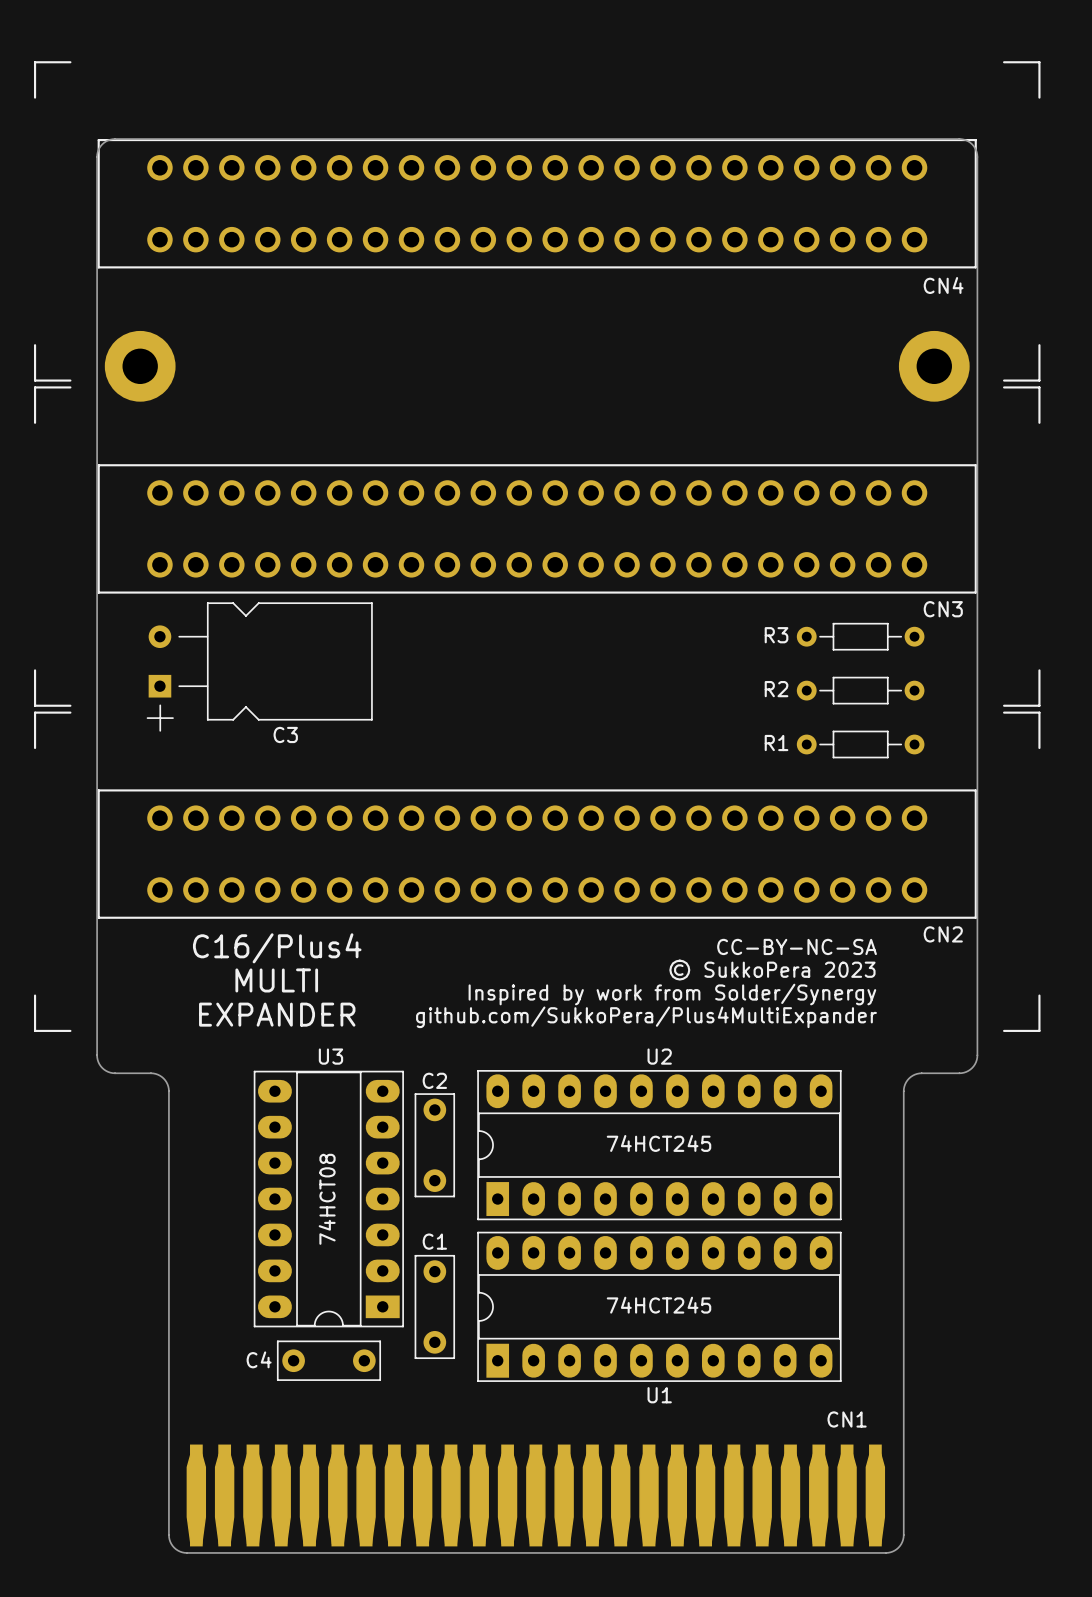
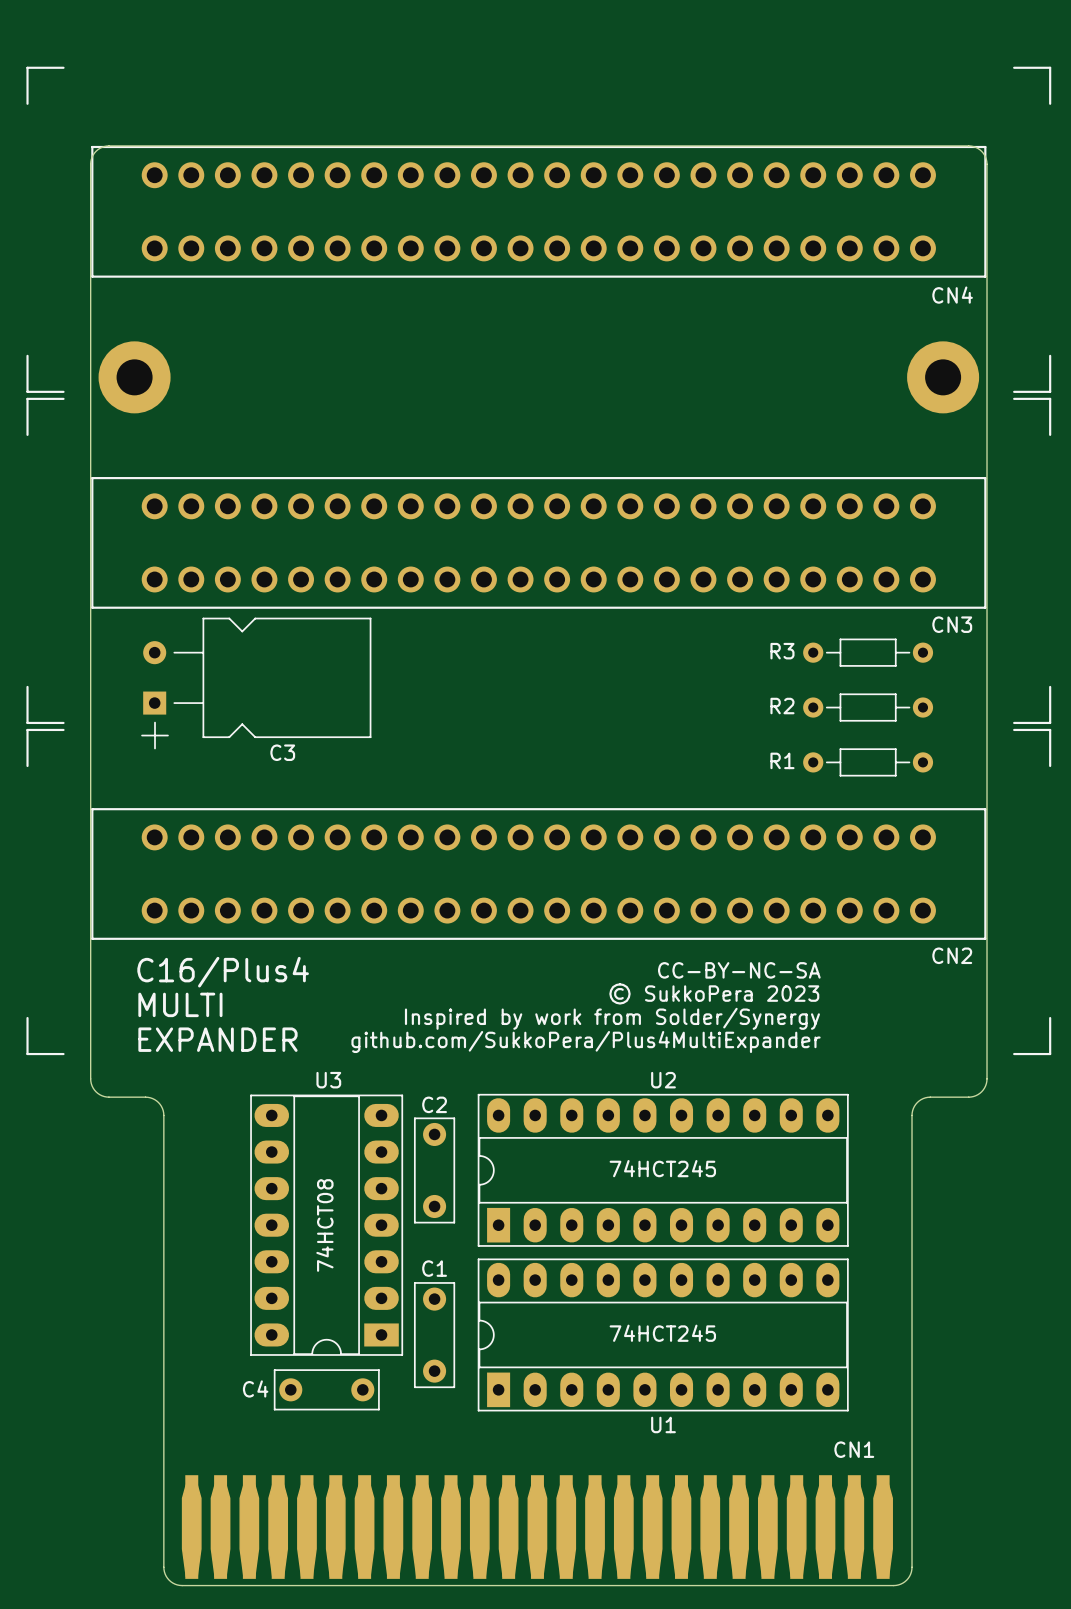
text position: CC-BY-NC-SA (797, 946) -> CC-BY-NC-SA (739, 970)
text position: C16/Plus4 (277, 948) -> C16/Plus4 (223, 972)
text position: © SukkoPera 2023 (772, 970) -> © SukkoPera 2023 (714, 993)
text position: MULTI (276, 980) -> MULTI (180, 1004)
text position: Inspired by work from Solder/Synergy (672, 994) -> Inspired by work from Solder/Synergy (612, 1018)
text position: EXPANDER (277, 1014) -> EXPANDER (217, 1039)
text position: github.com/SukkoPera/Plus4MultiExpander (646, 1017) -> github.com/SukkoPera/Plus4MultiExpander (586, 1042)

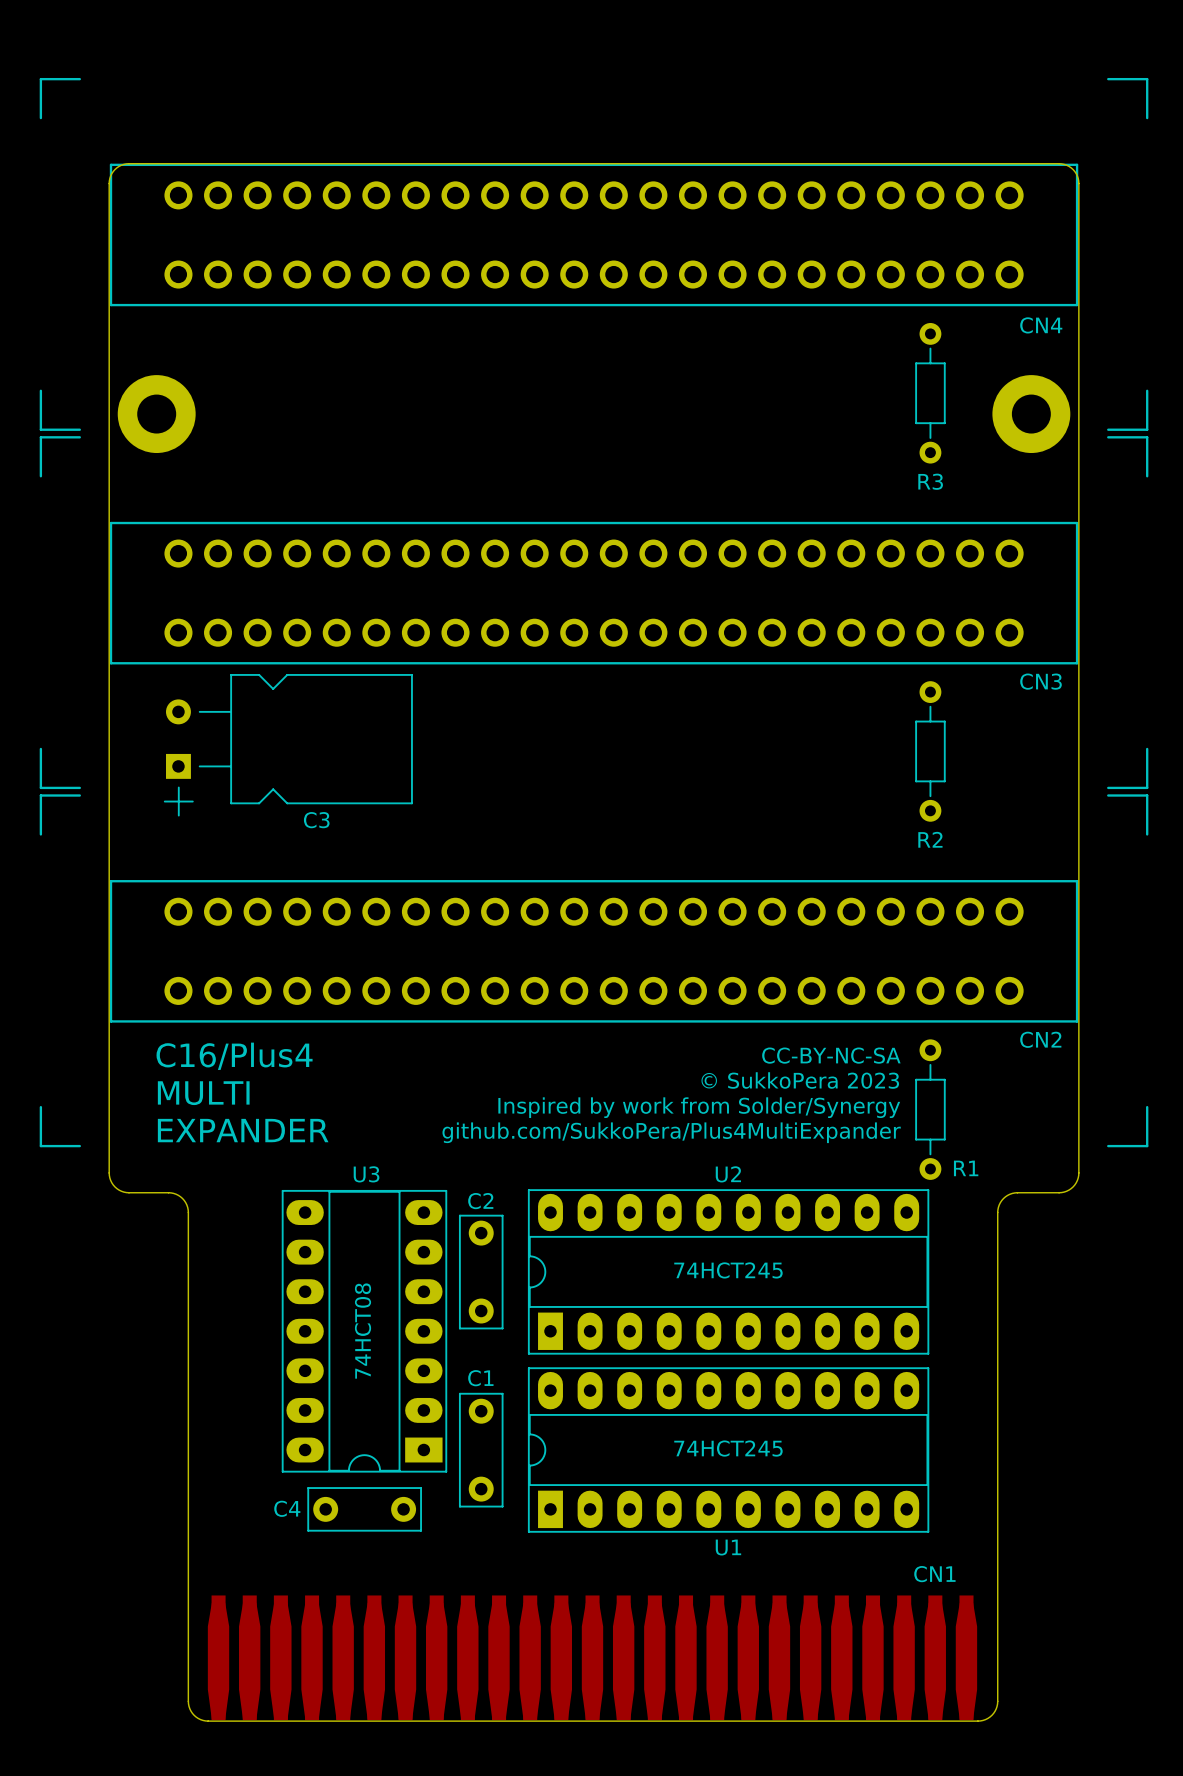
R3 name position: R3 (782, 651) -> R3 (930, 481)
R3 rotation: 0° (868, 652) -> 90° clockwise (930, 393)
R3 position: (868, 652) -> (930, 393)
R2 name position: R2 (782, 706) -> R2 (930, 839)
R2 rotation: 0° (868, 707) -> 90° clockwise (930, 751)
R1 name position: R1 (782, 760) -> R1 (966, 1168)
R1 rotation: 0° (868, 762) -> 90° clockwise (930, 1109)
R1 position: (868, 762) -> (930, 1109)
CN1 footprint: [181, 1475, 893, 1579] -> [207, 1595, 978, 1721]

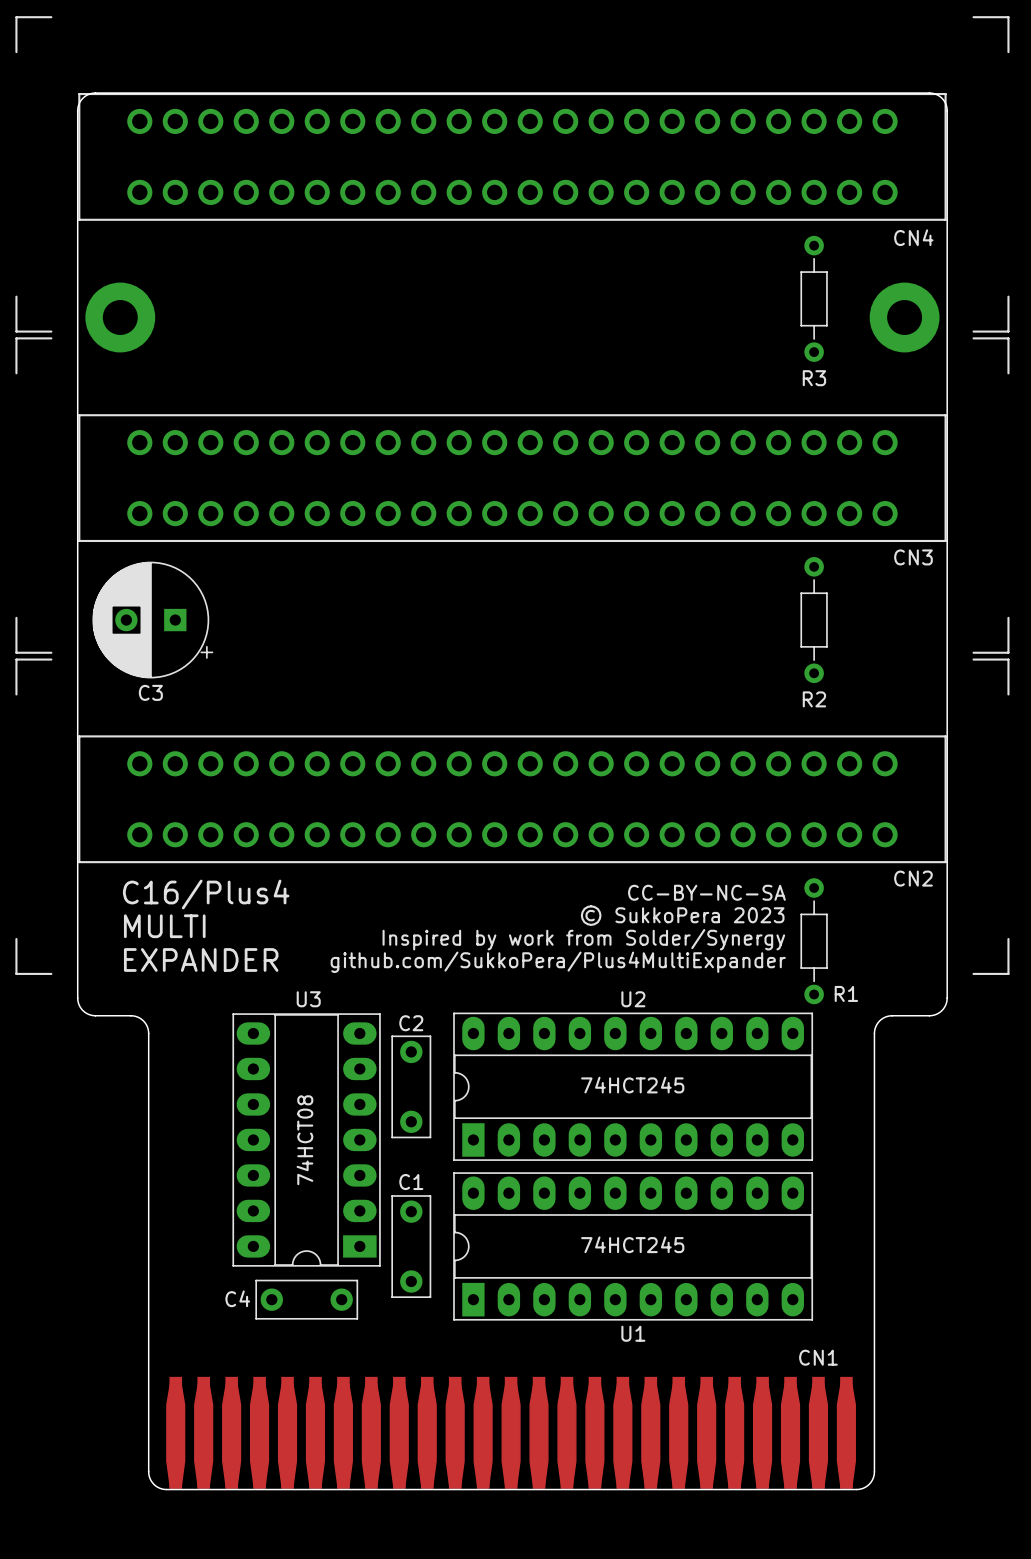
C3 footprint: [163, 674, 413, 817] -> [92, 561, 214, 679]
C3 name position: C3 (316, 820) -> C3 (150, 692)

